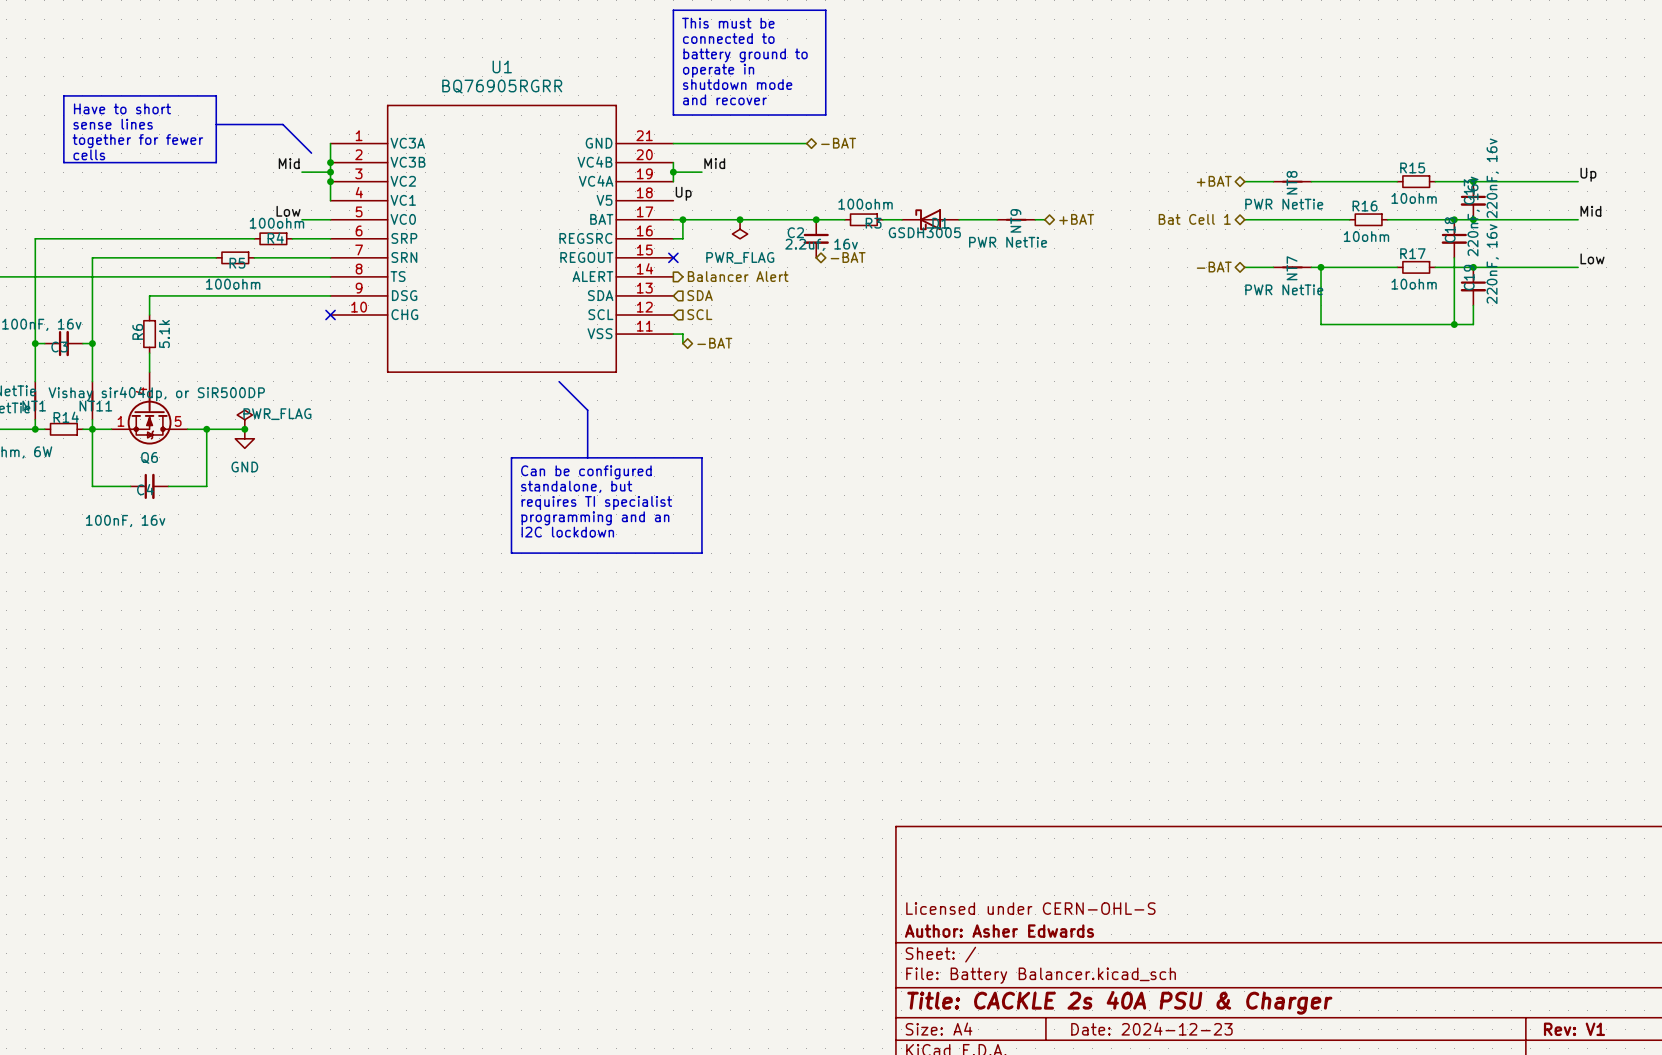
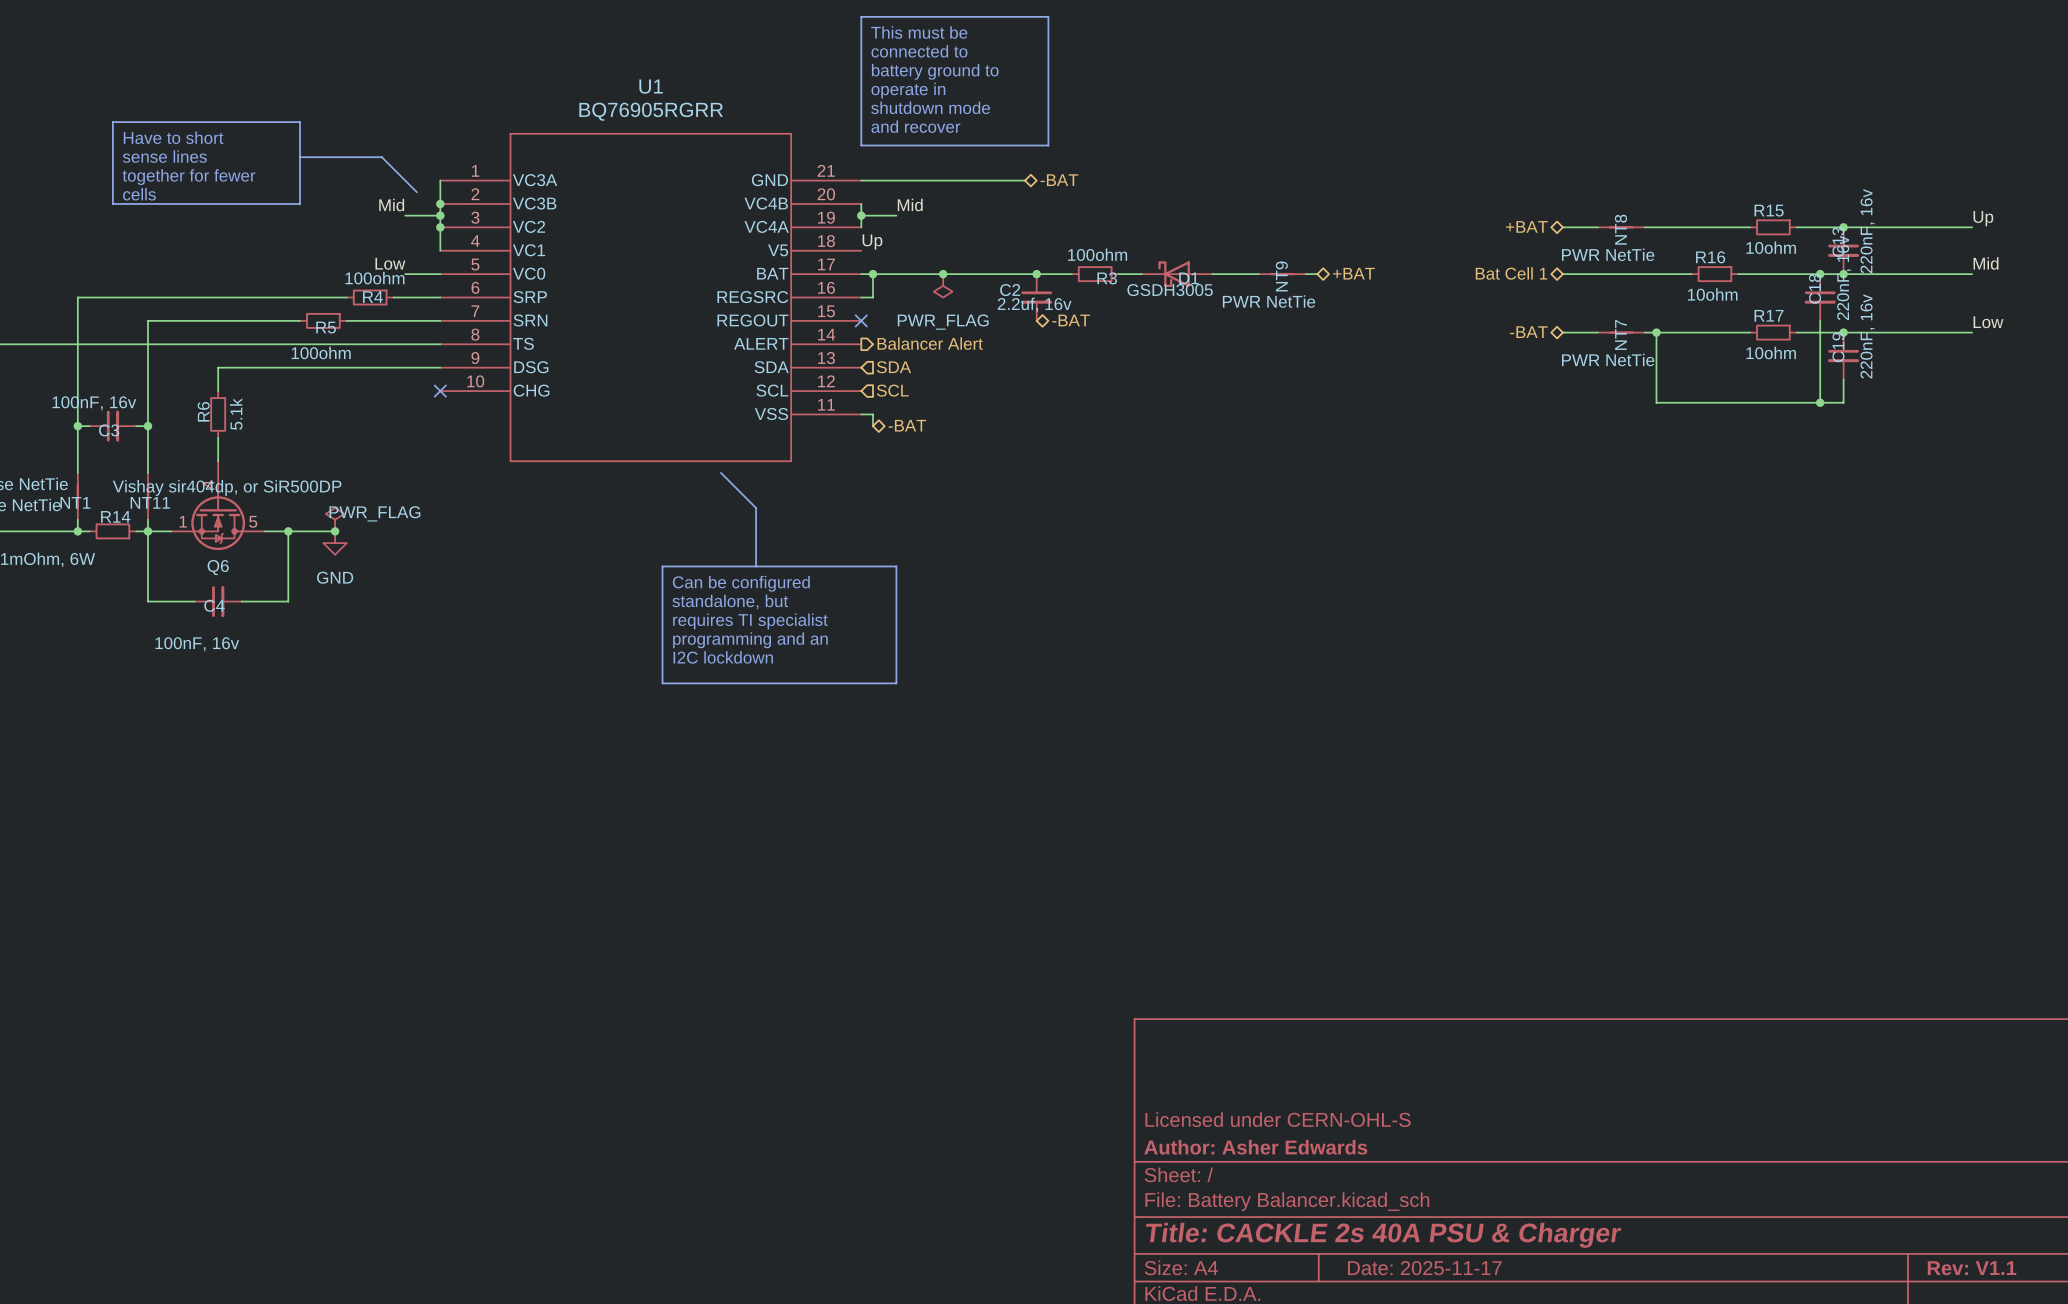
title block: Date: 2024-12-23 (1151, 1029) -> Date: 2025-11-17 (1424, 1268)
title block: Rev: V1 (1574, 1029) -> Rev: V1.1 (1972, 1268)

